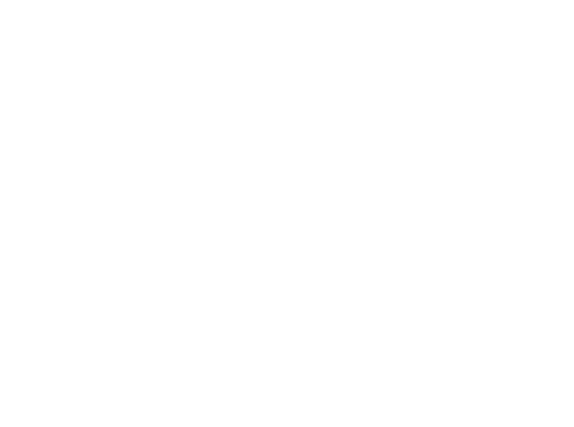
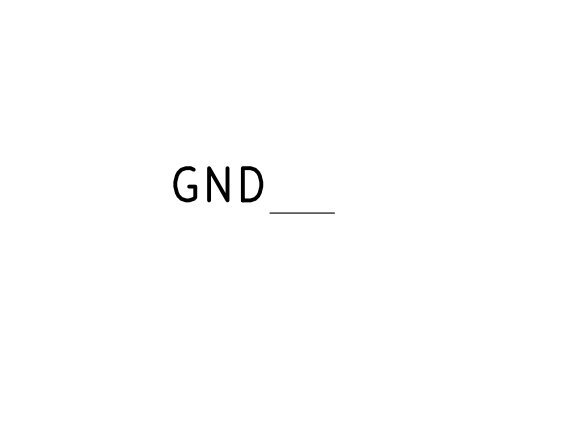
label: none -> GND (218, 184)
wire: none -> (269, 213) (334, 213)

